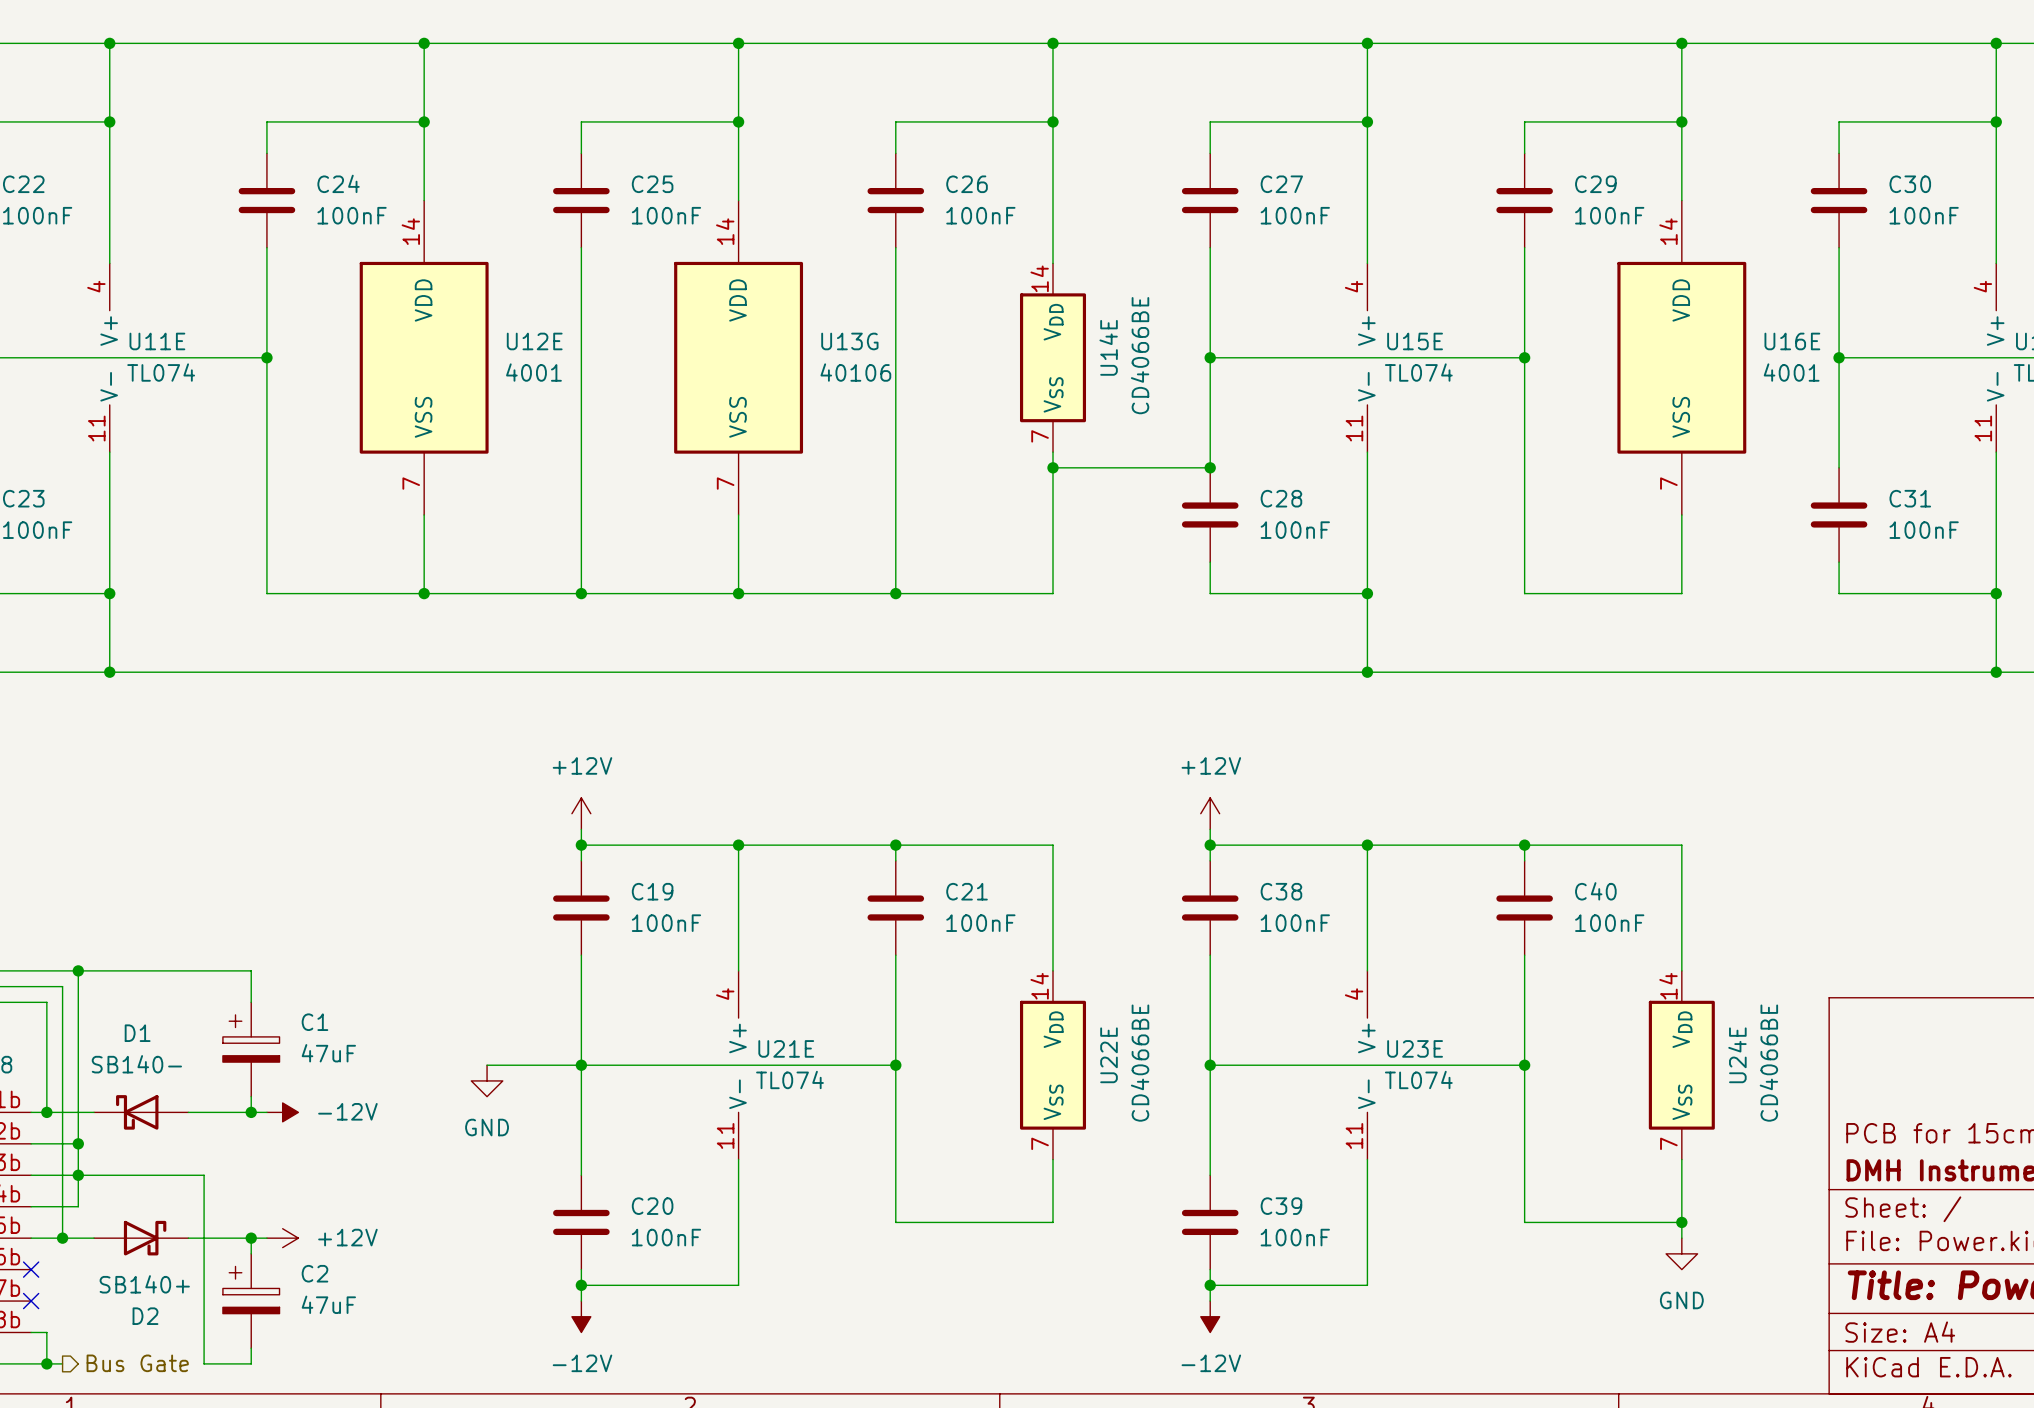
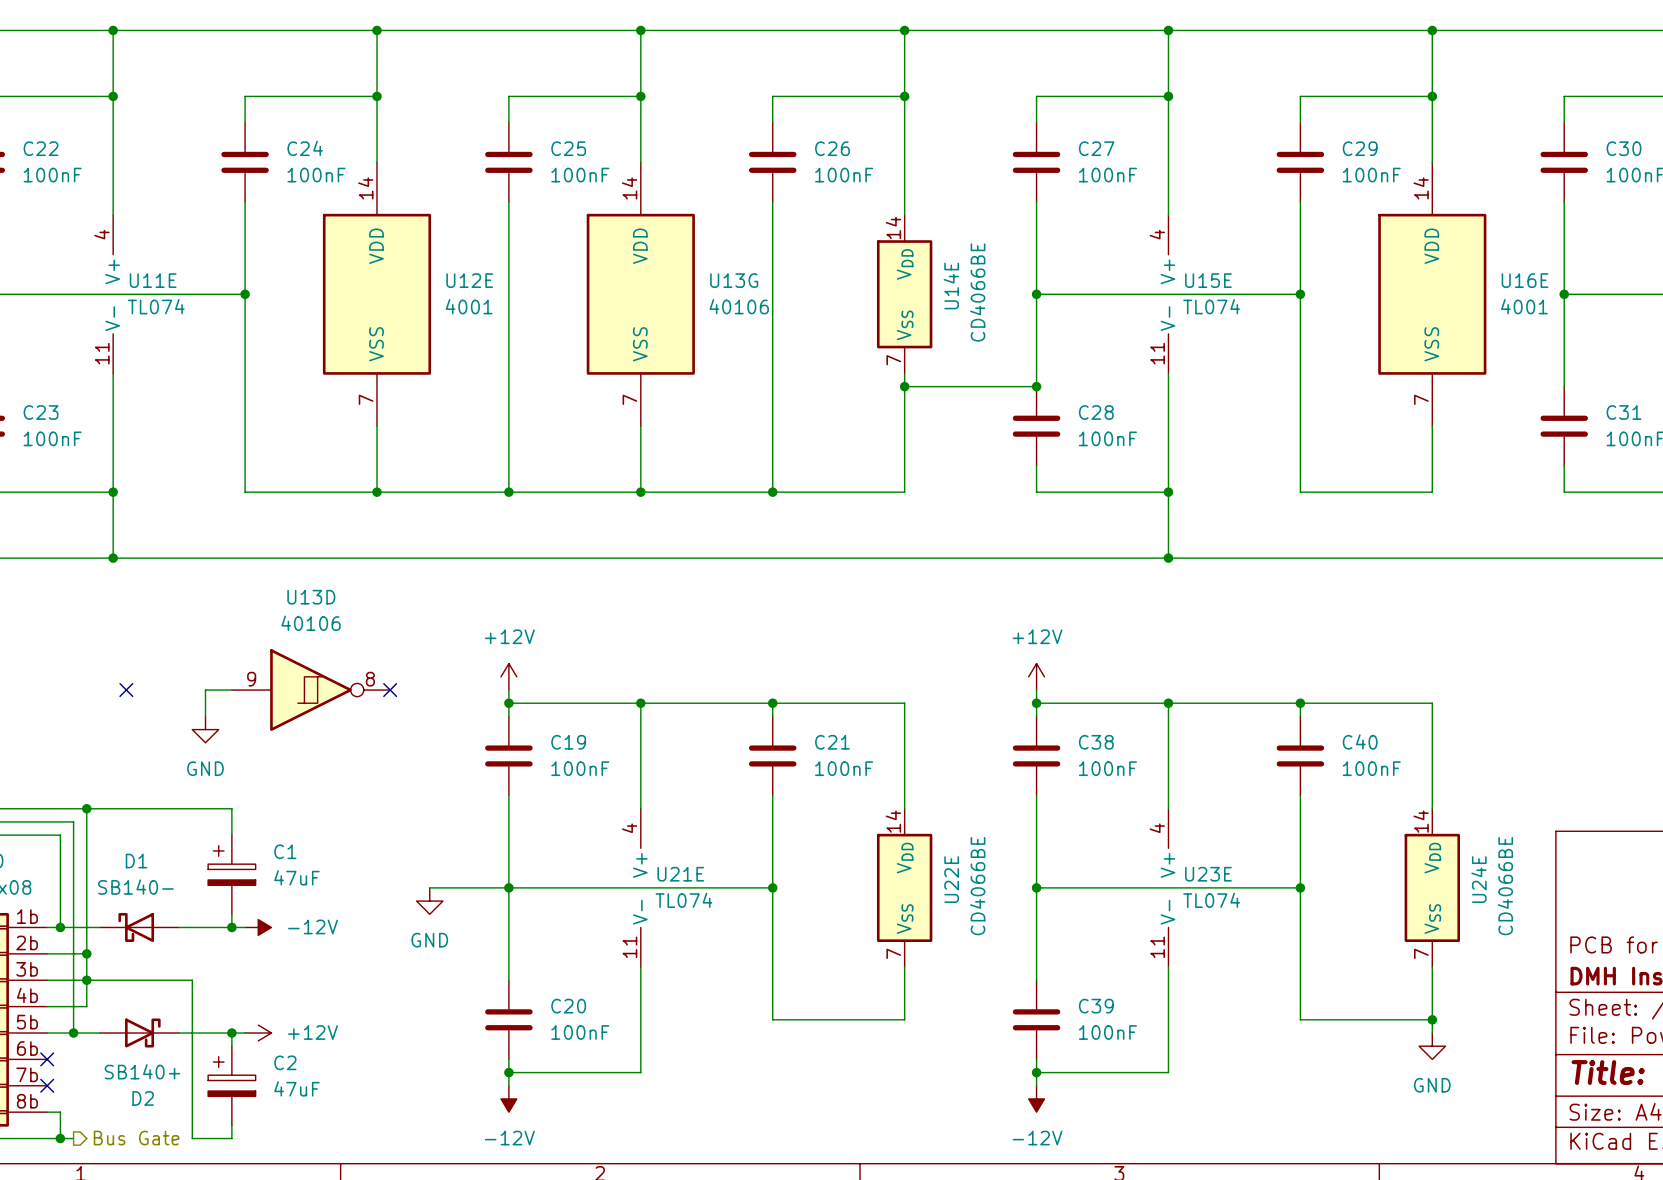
no-connect mark: none -> (126, 690)
wire: none -> (231, 690) (205, 690) (205, 716)
U13D: none -> 40106 (311, 690)
no-connect mark: none -> (390, 690)
power symbol: none -> GND (205, 729)

